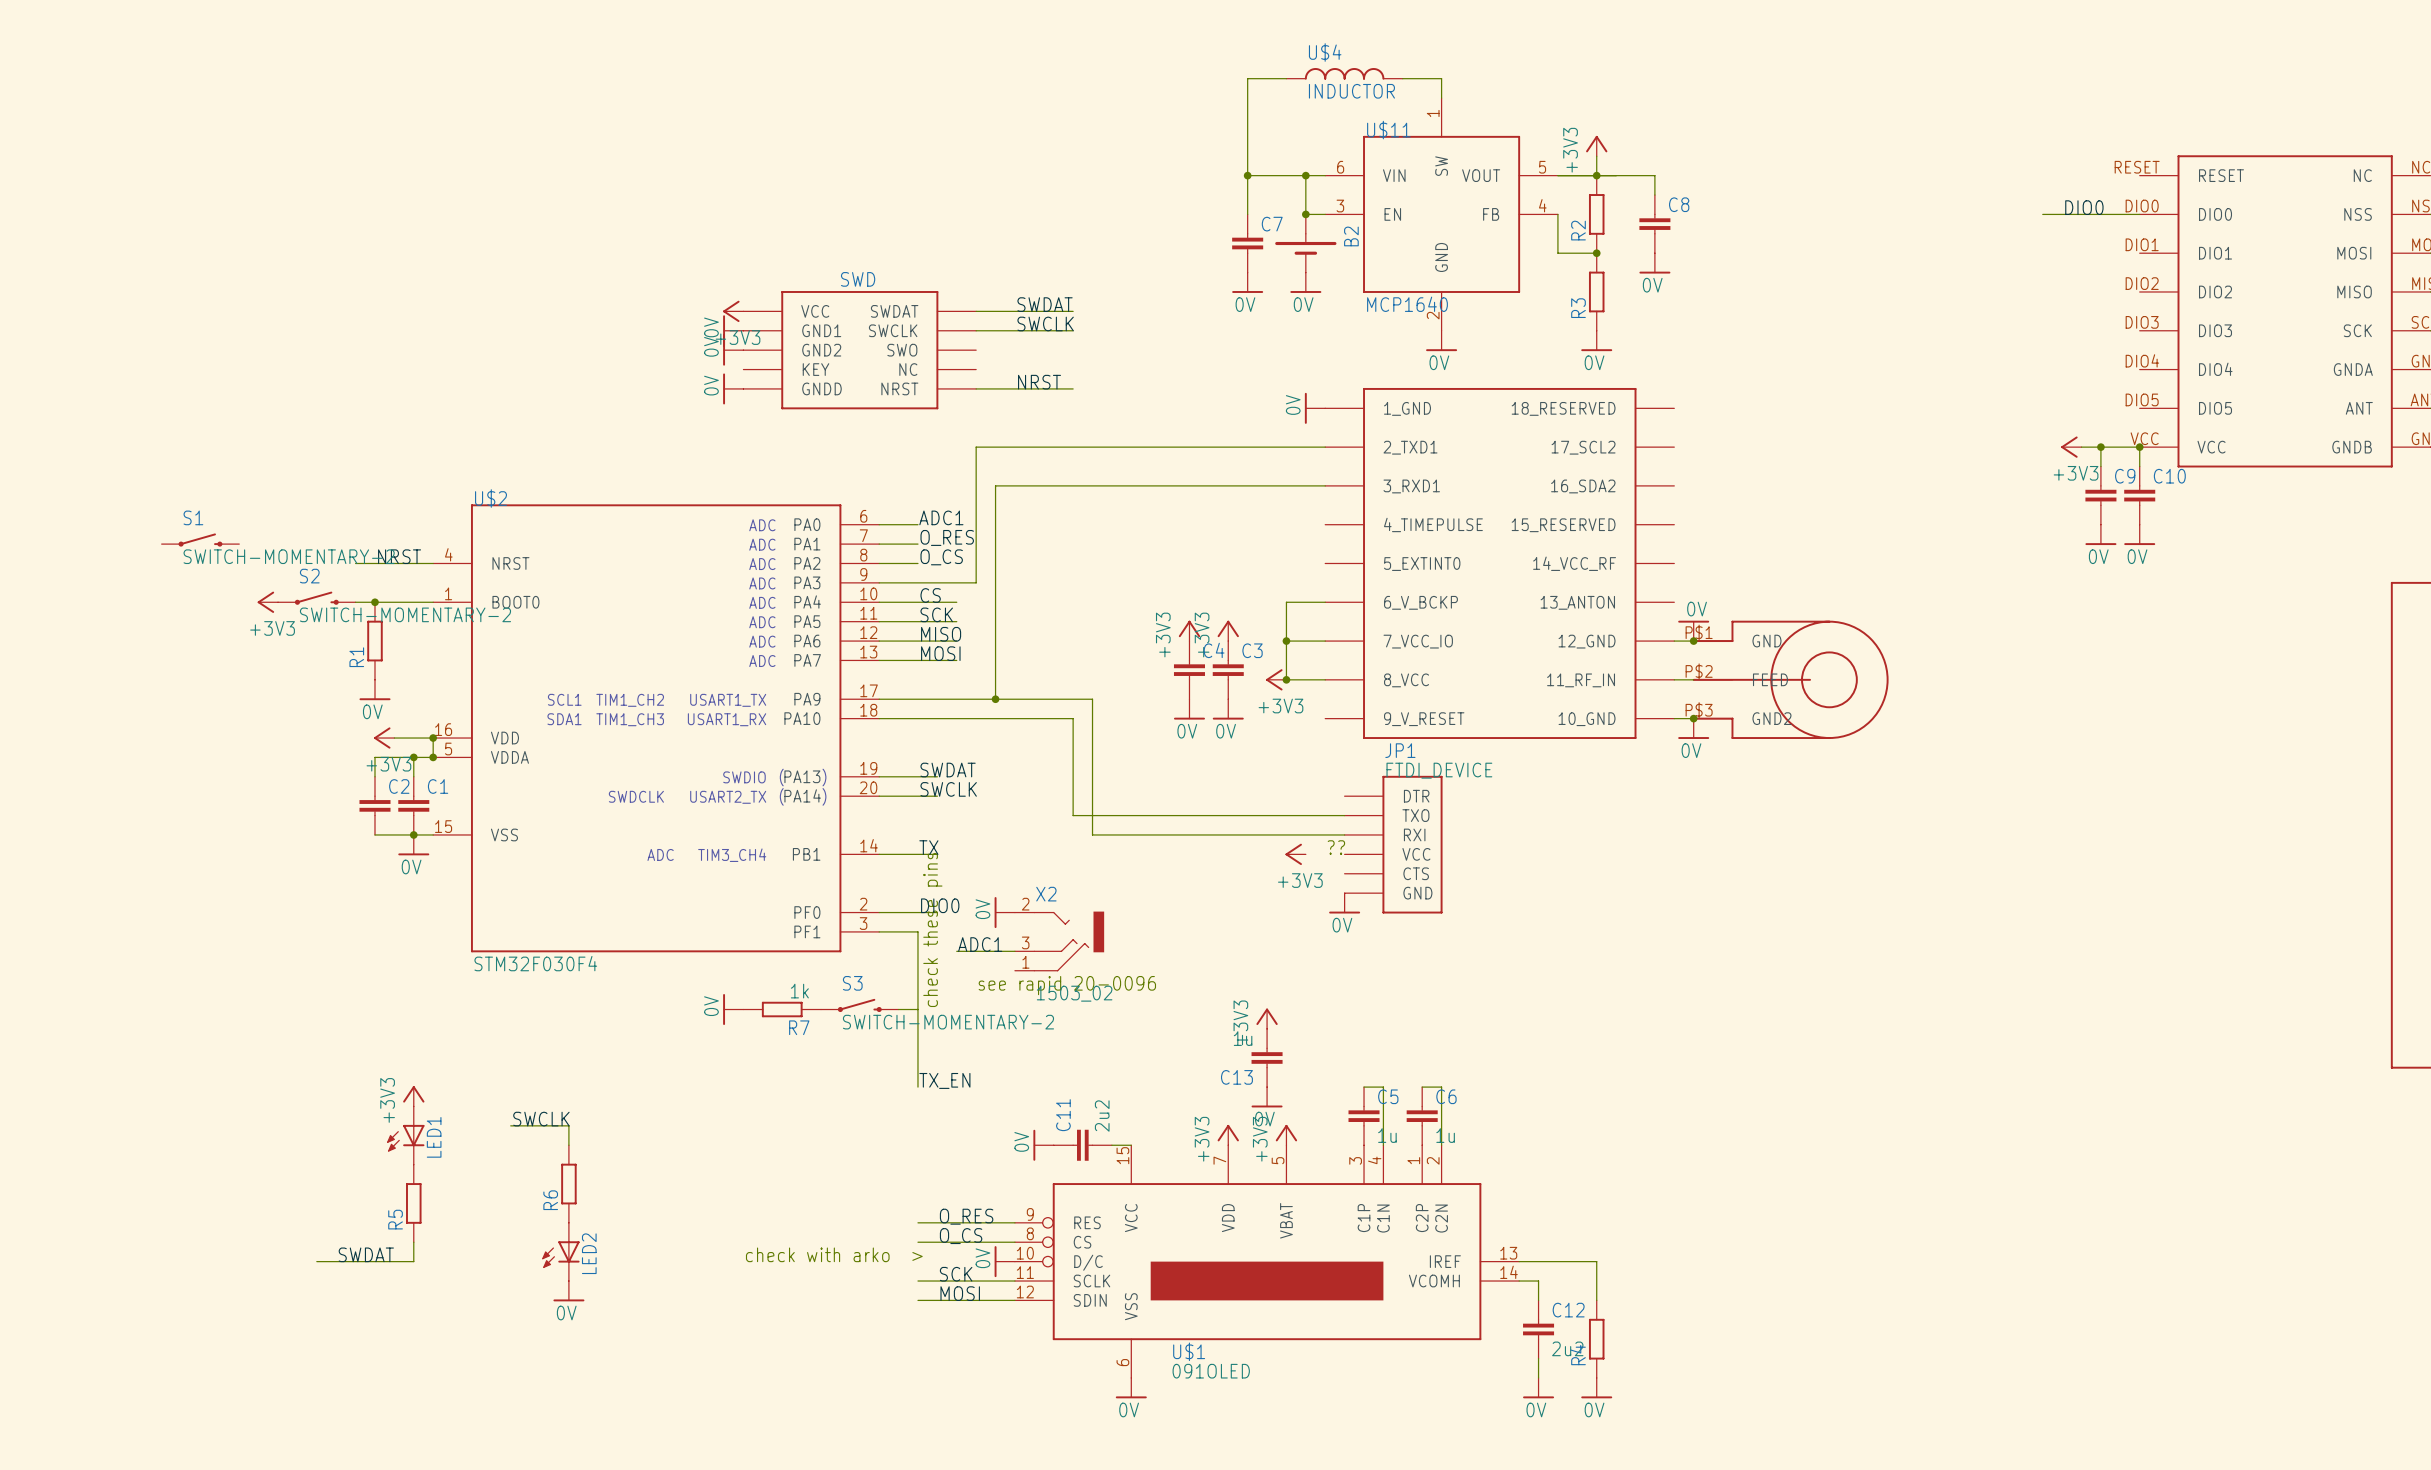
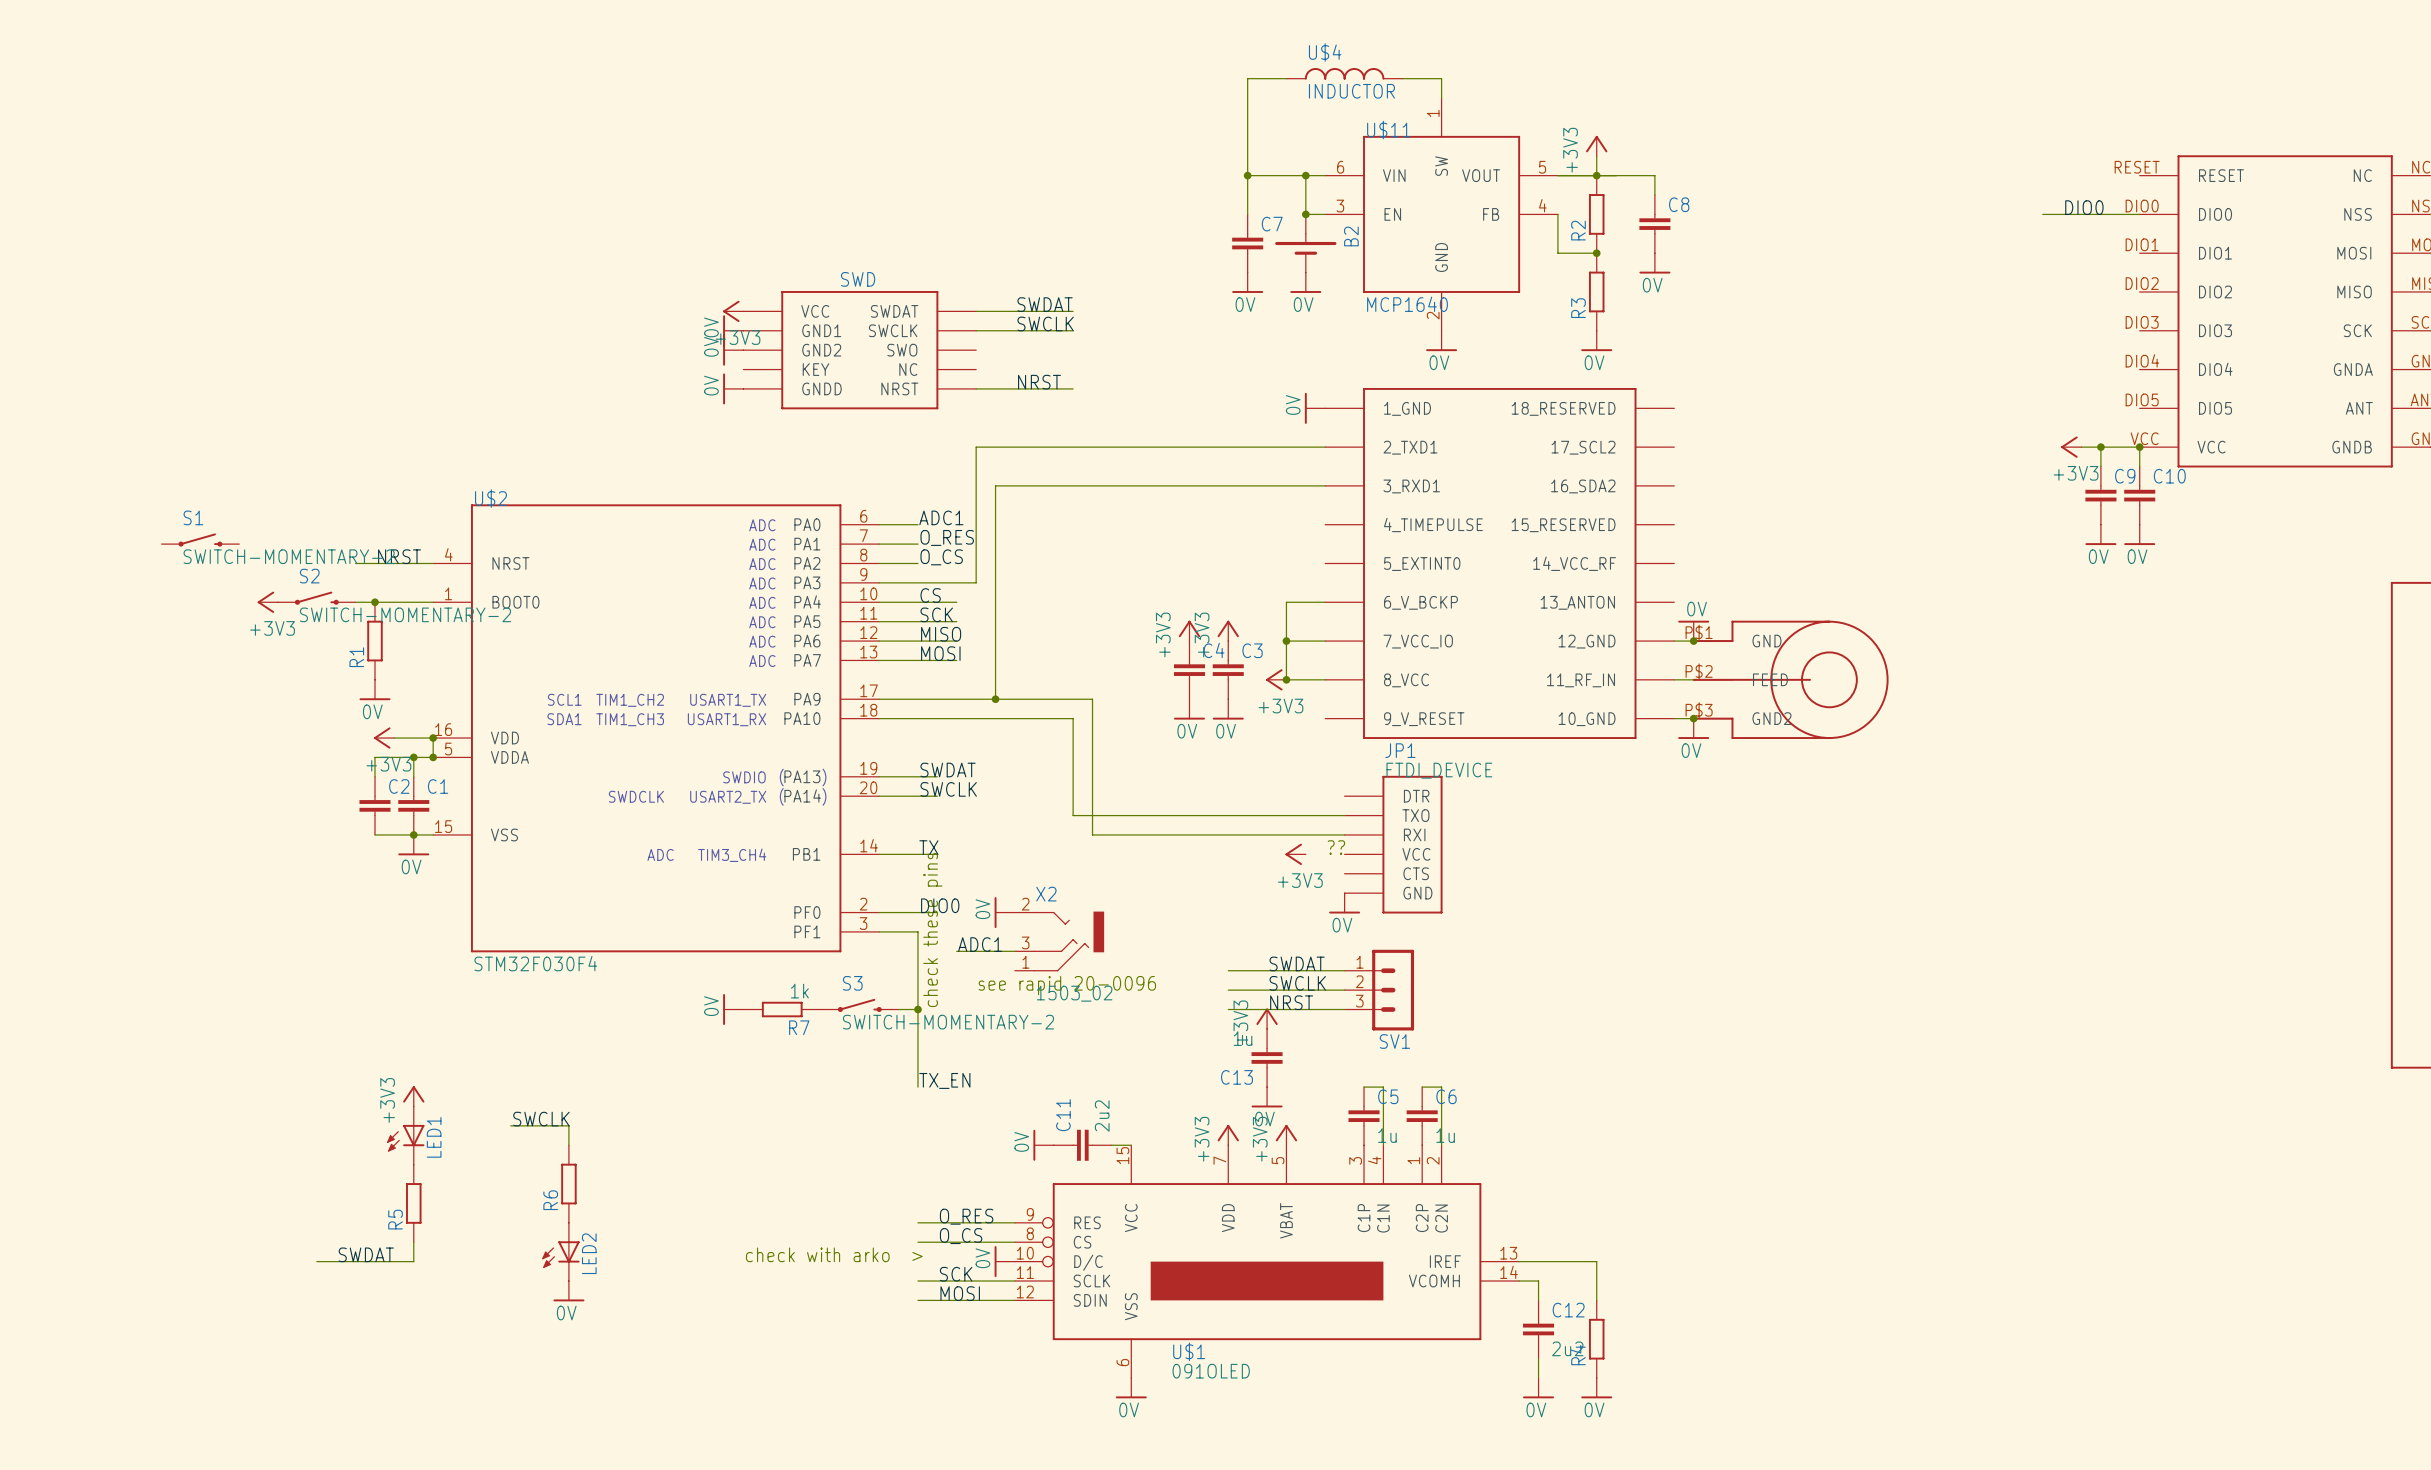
label: none -> SWDAT (1297, 963)
wire: none -> (1228, 970) (1344, 970)
label: none -> SWCLK (1297, 983)
wire: none -> (1228, 990) (1344, 990)
SV1: none -> (1379, 990)
label: none -> NRST (1291, 1002)
junction: none -> (917, 1009)
wire: none -> (1228, 1009) (1344, 1009)

